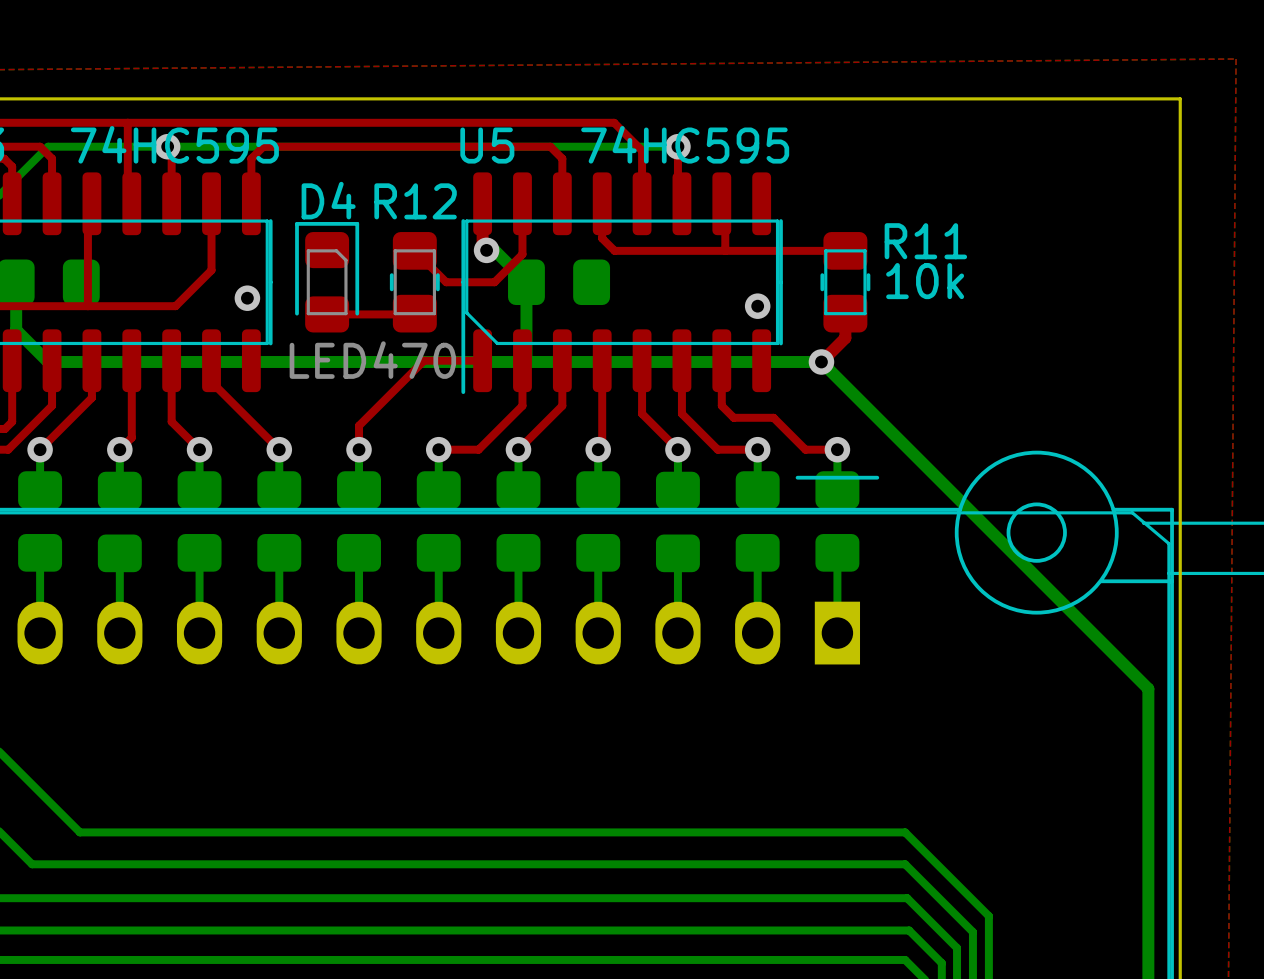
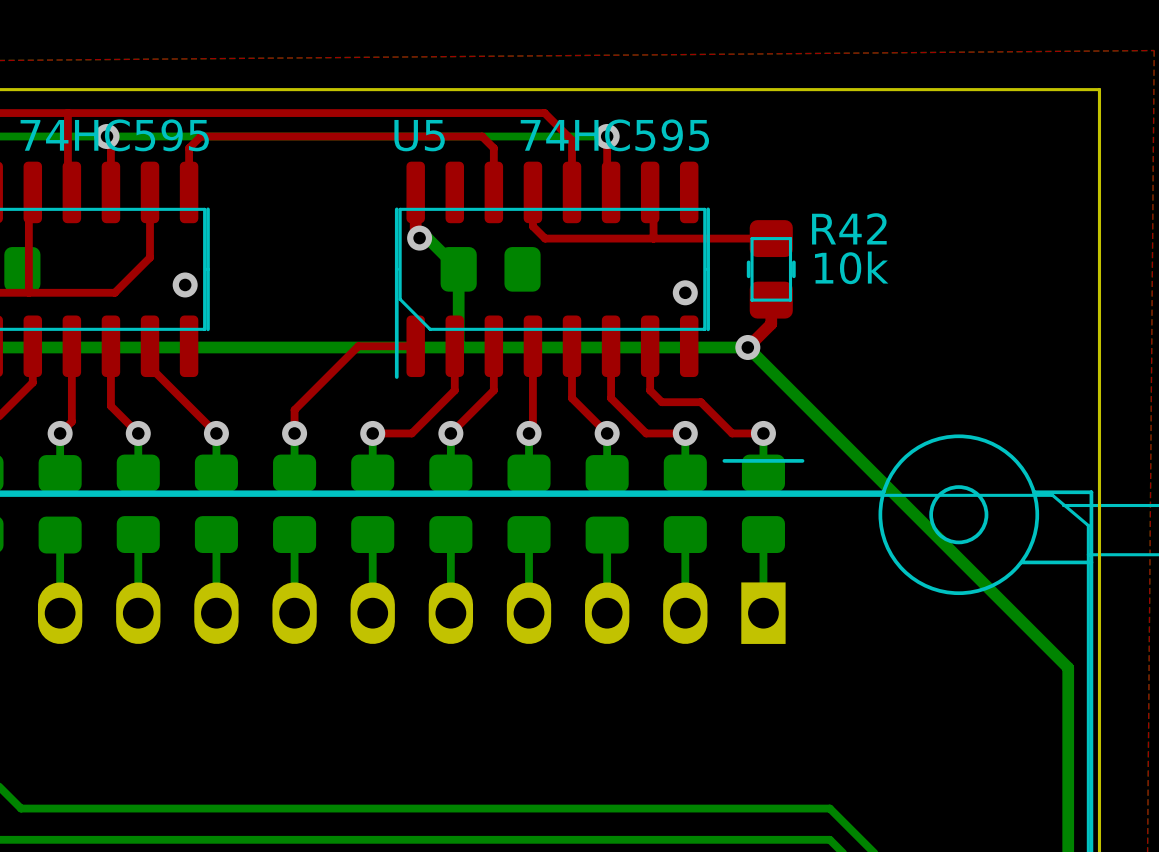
top track: (522, 203) (522, 254) (494, 282) (446, 282) (414, 250) -> none
R11 name: R11 (925, 241) -> R42 (849, 228)
D4: LED (327, 277) -> none
R12: 470 (414, 282) -> none
top track: (414, 313) (327, 314) -> none

